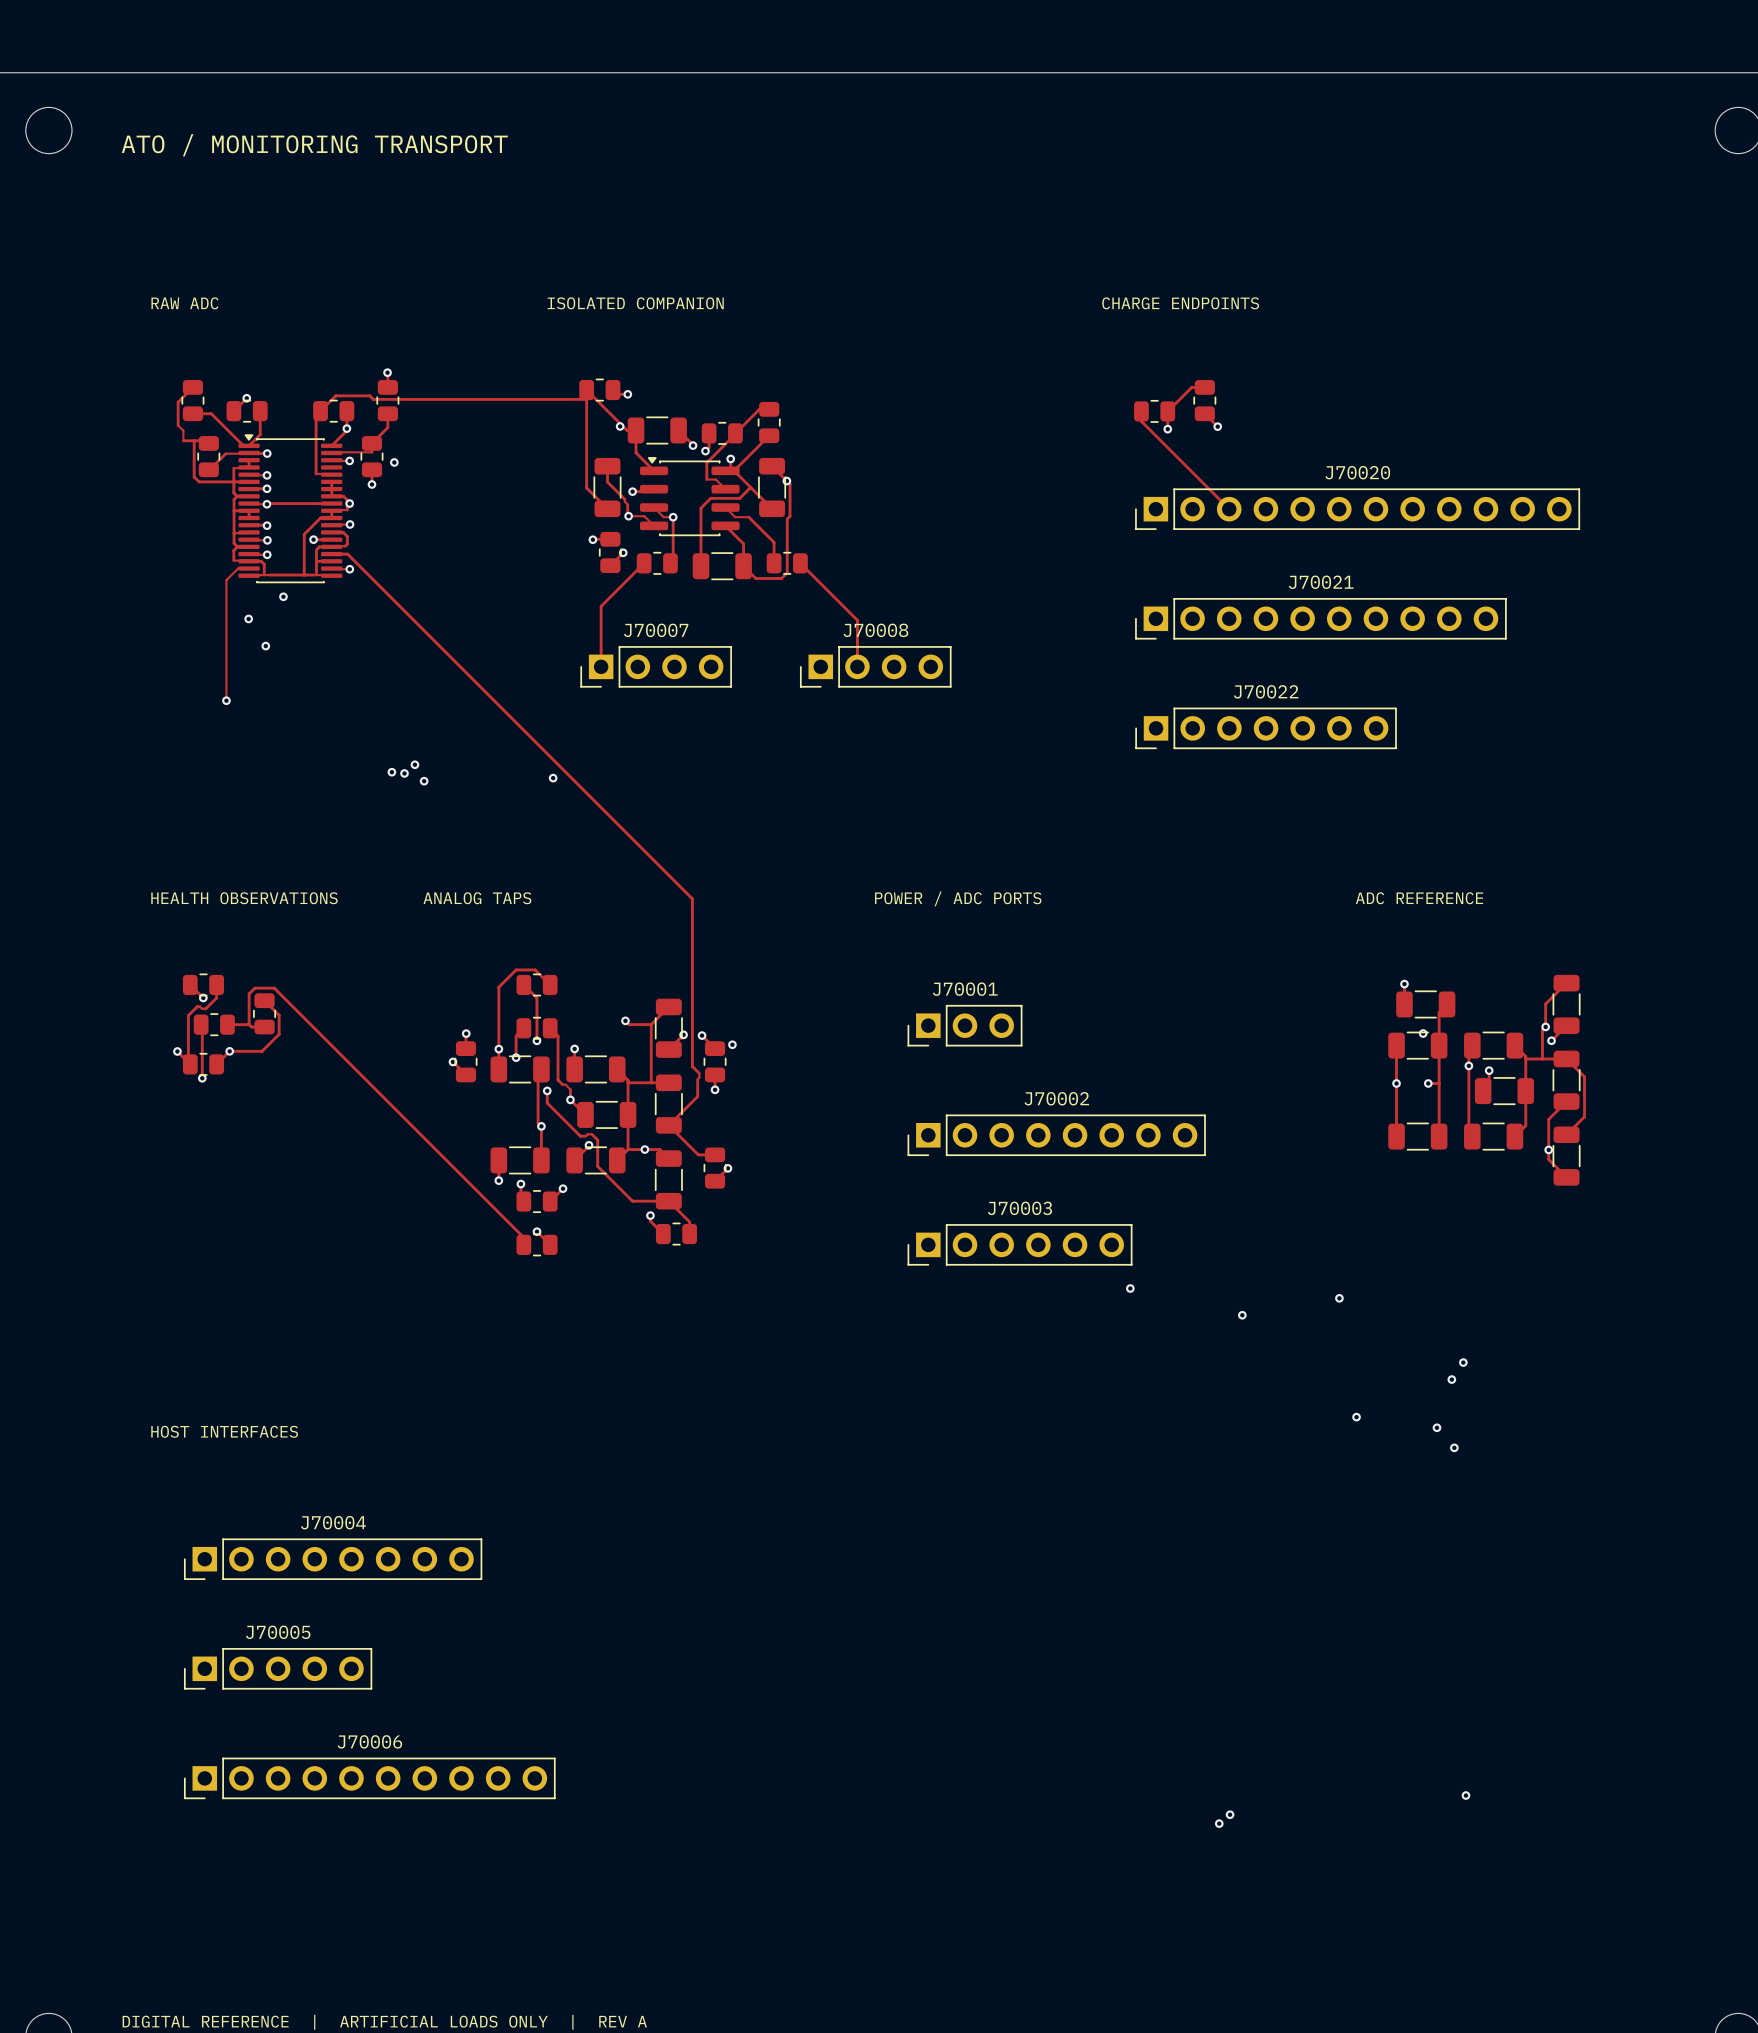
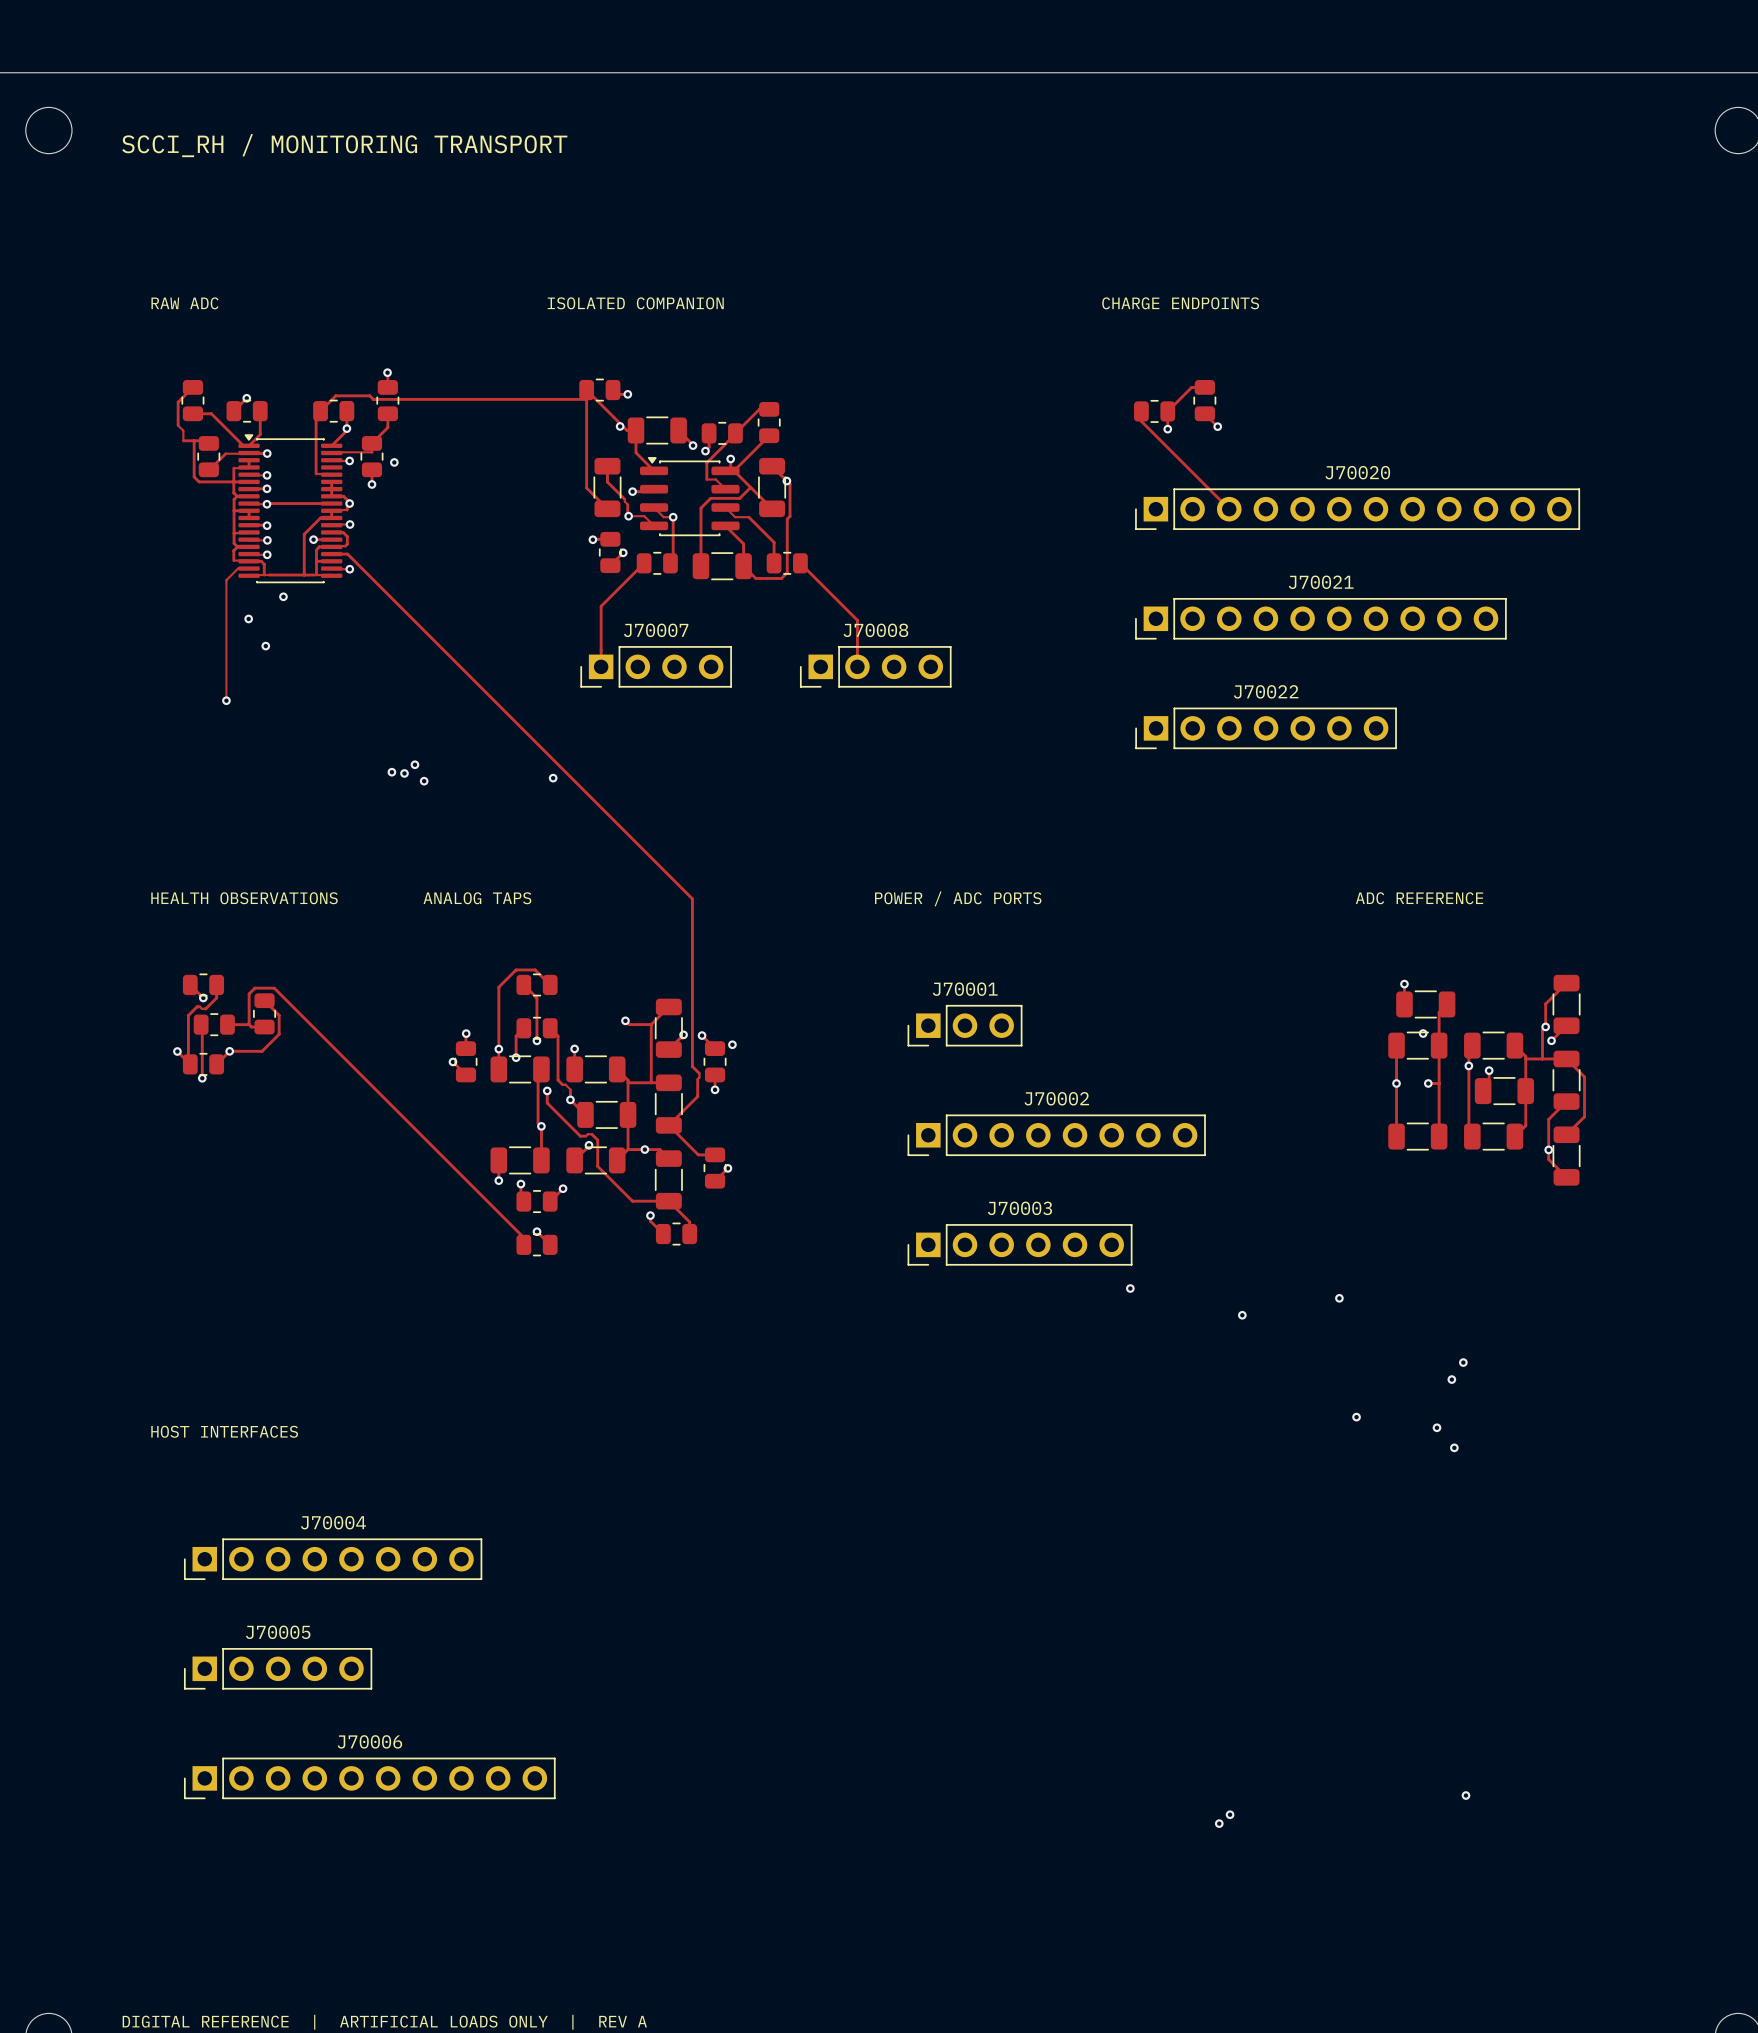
text: ATO / MONITORING TRANSPORT (314, 145) -> SCCI_RH / MONITORING TRANSPORT (344, 145)

